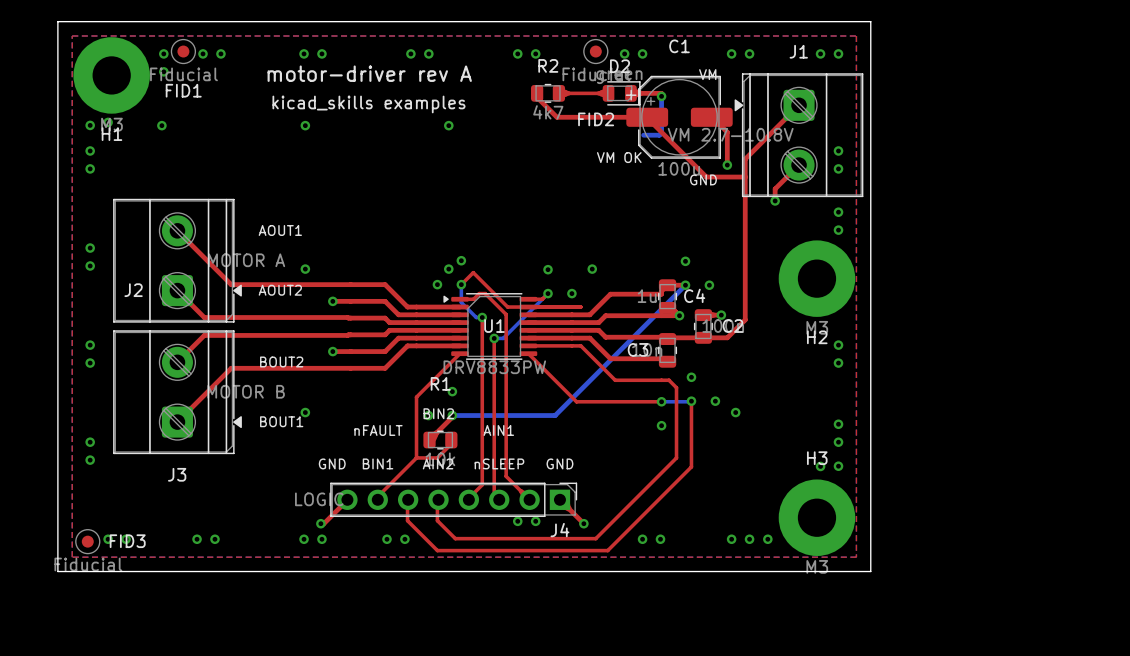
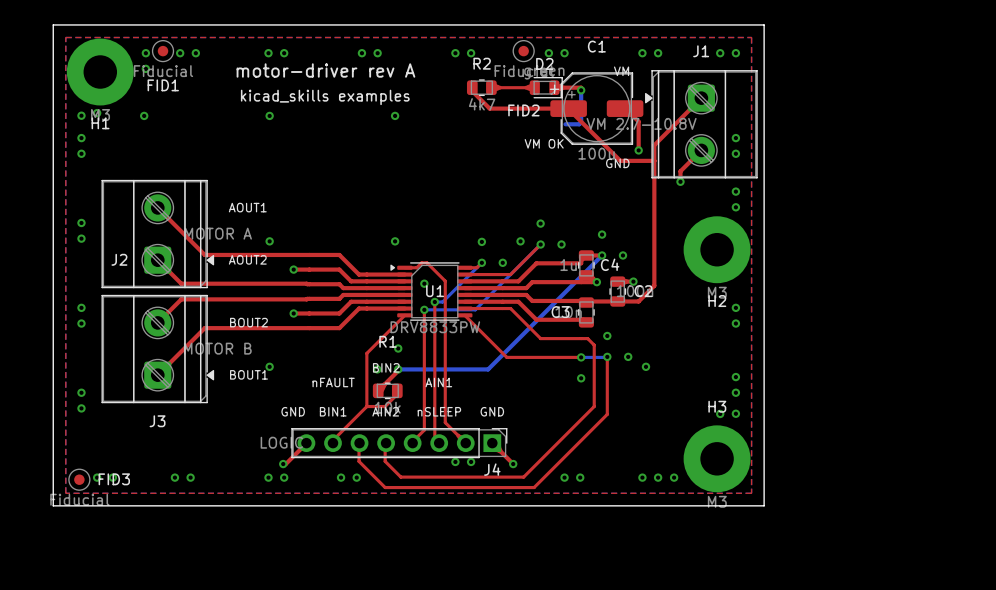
via: none -> (540, 223)
via: (461, 260) -> none
top track: none -> (540, 244) (510, 274)
bottom track: none -> (540, 244) (475, 309) (424, 309)
via: none -> (540, 244)
via: none -> (561, 244)
via: (437, 284) -> none
top track: (461, 284) (473, 272) (507, 307) (528, 307) -> none
bottom track: (461, 284) (461, 302) (476, 317) (482, 317) -> none
via: (461, 284) -> none
top track: (482, 317) (482, 347) -> none
via: none -> (424, 309)

